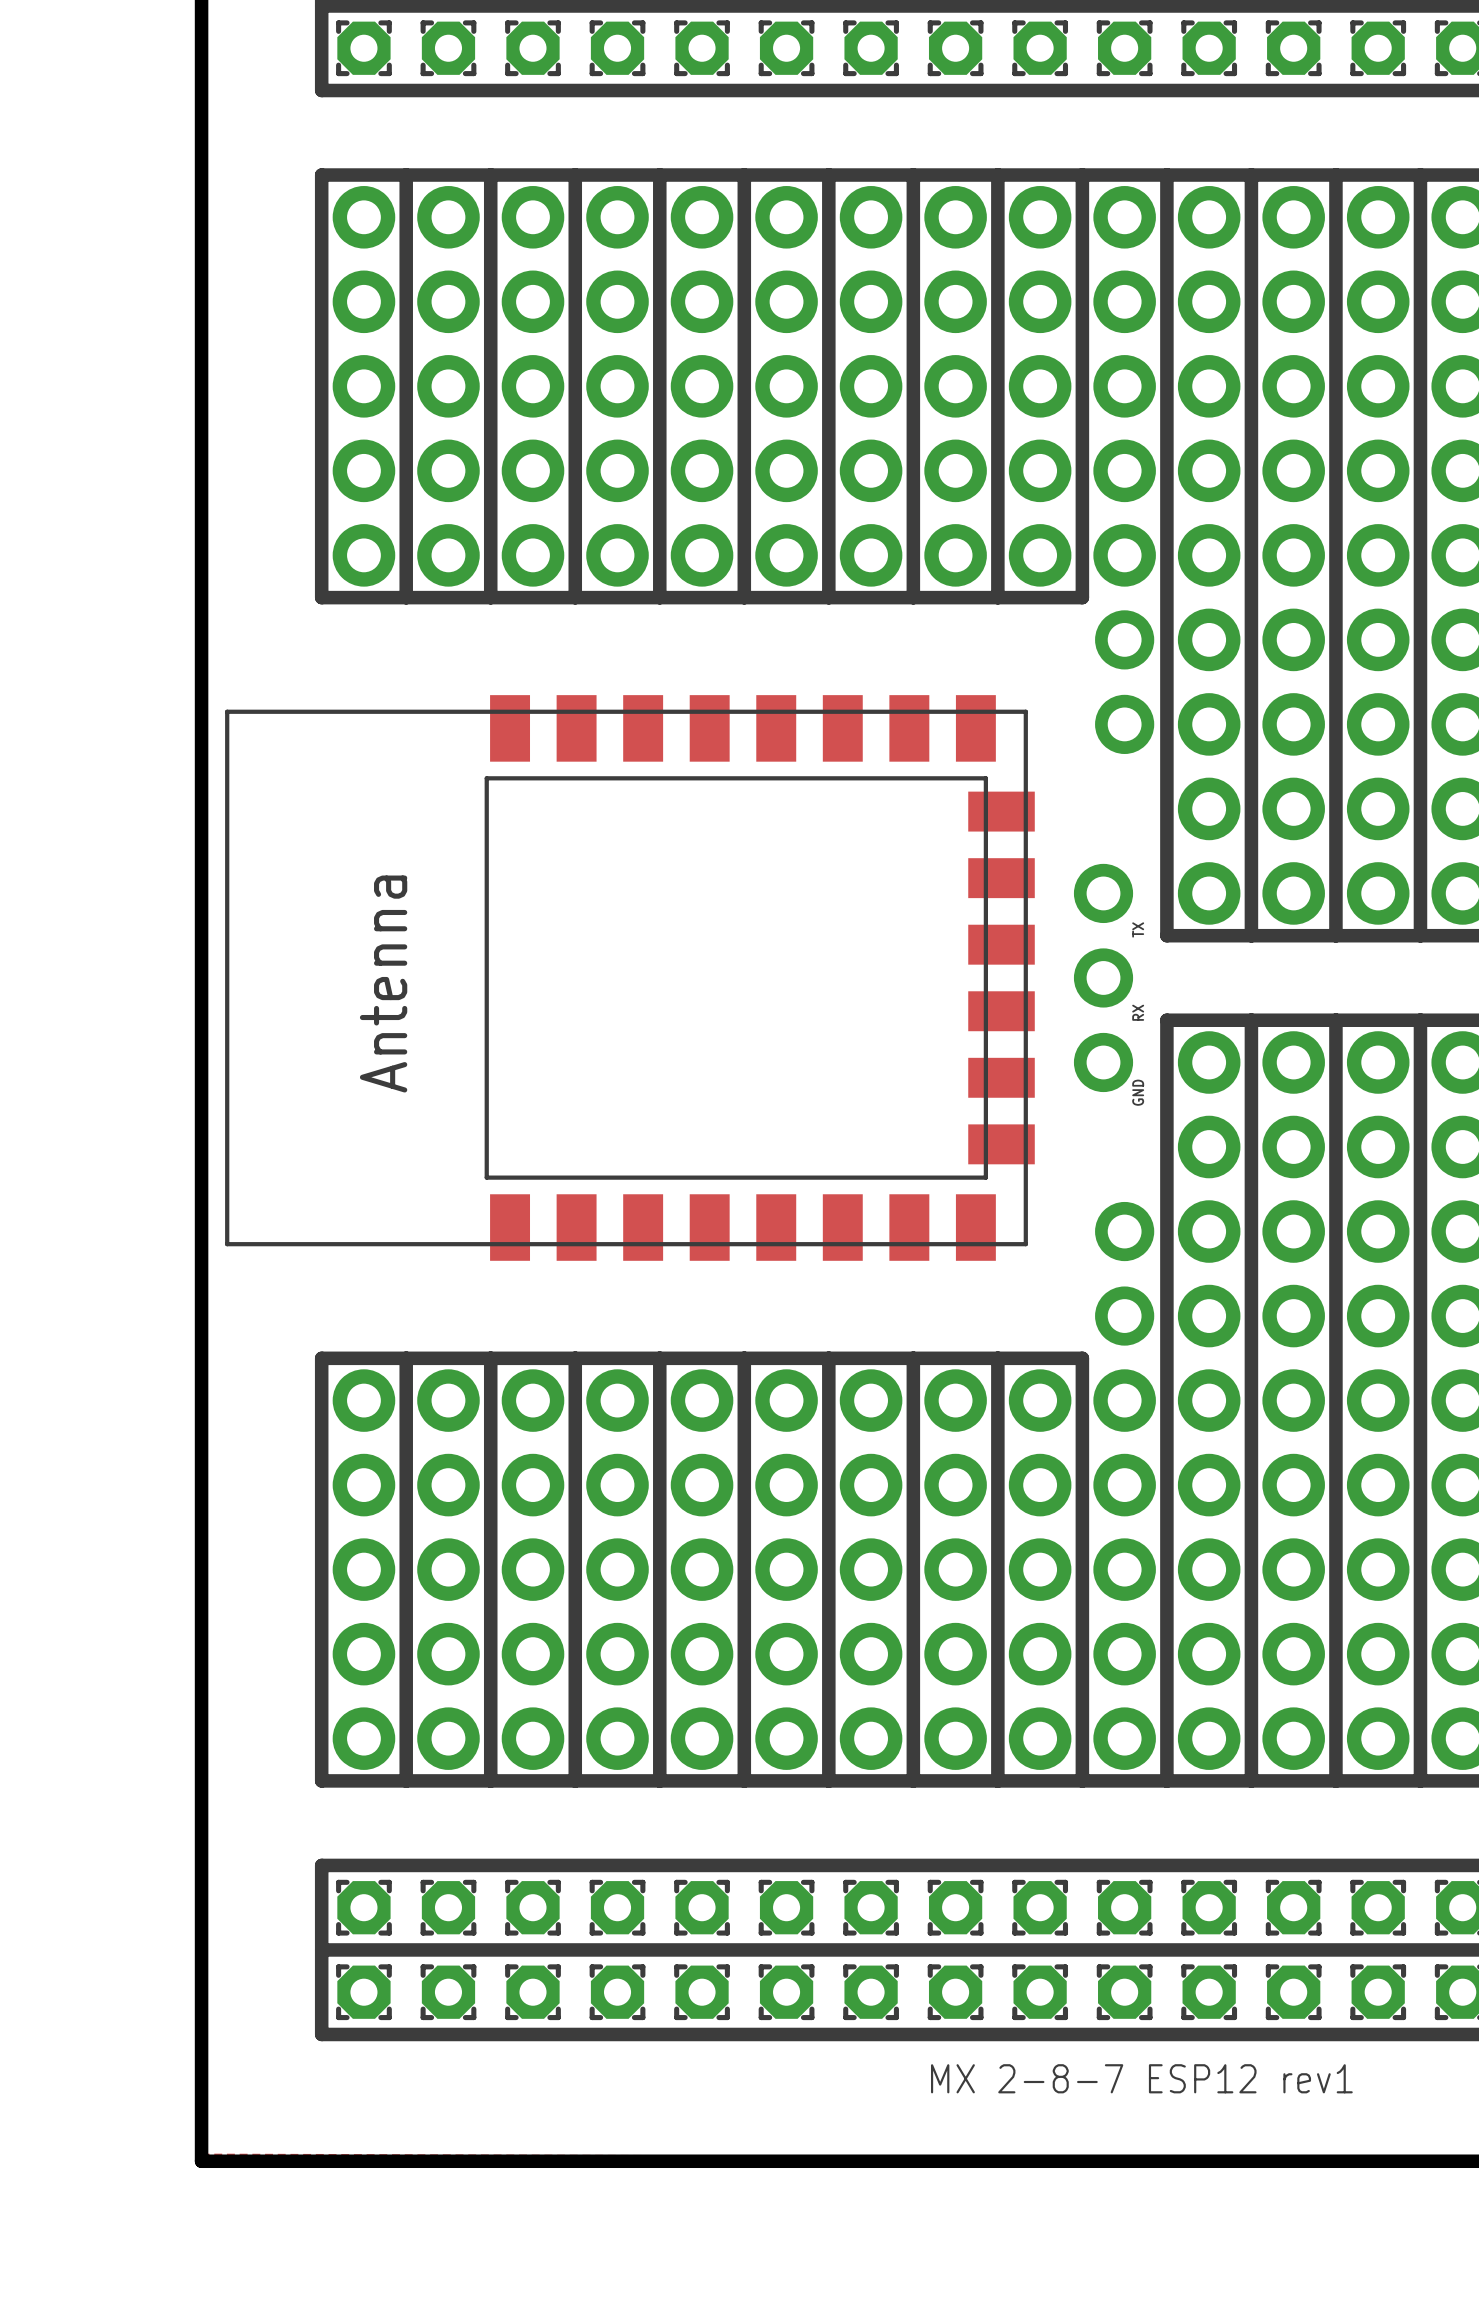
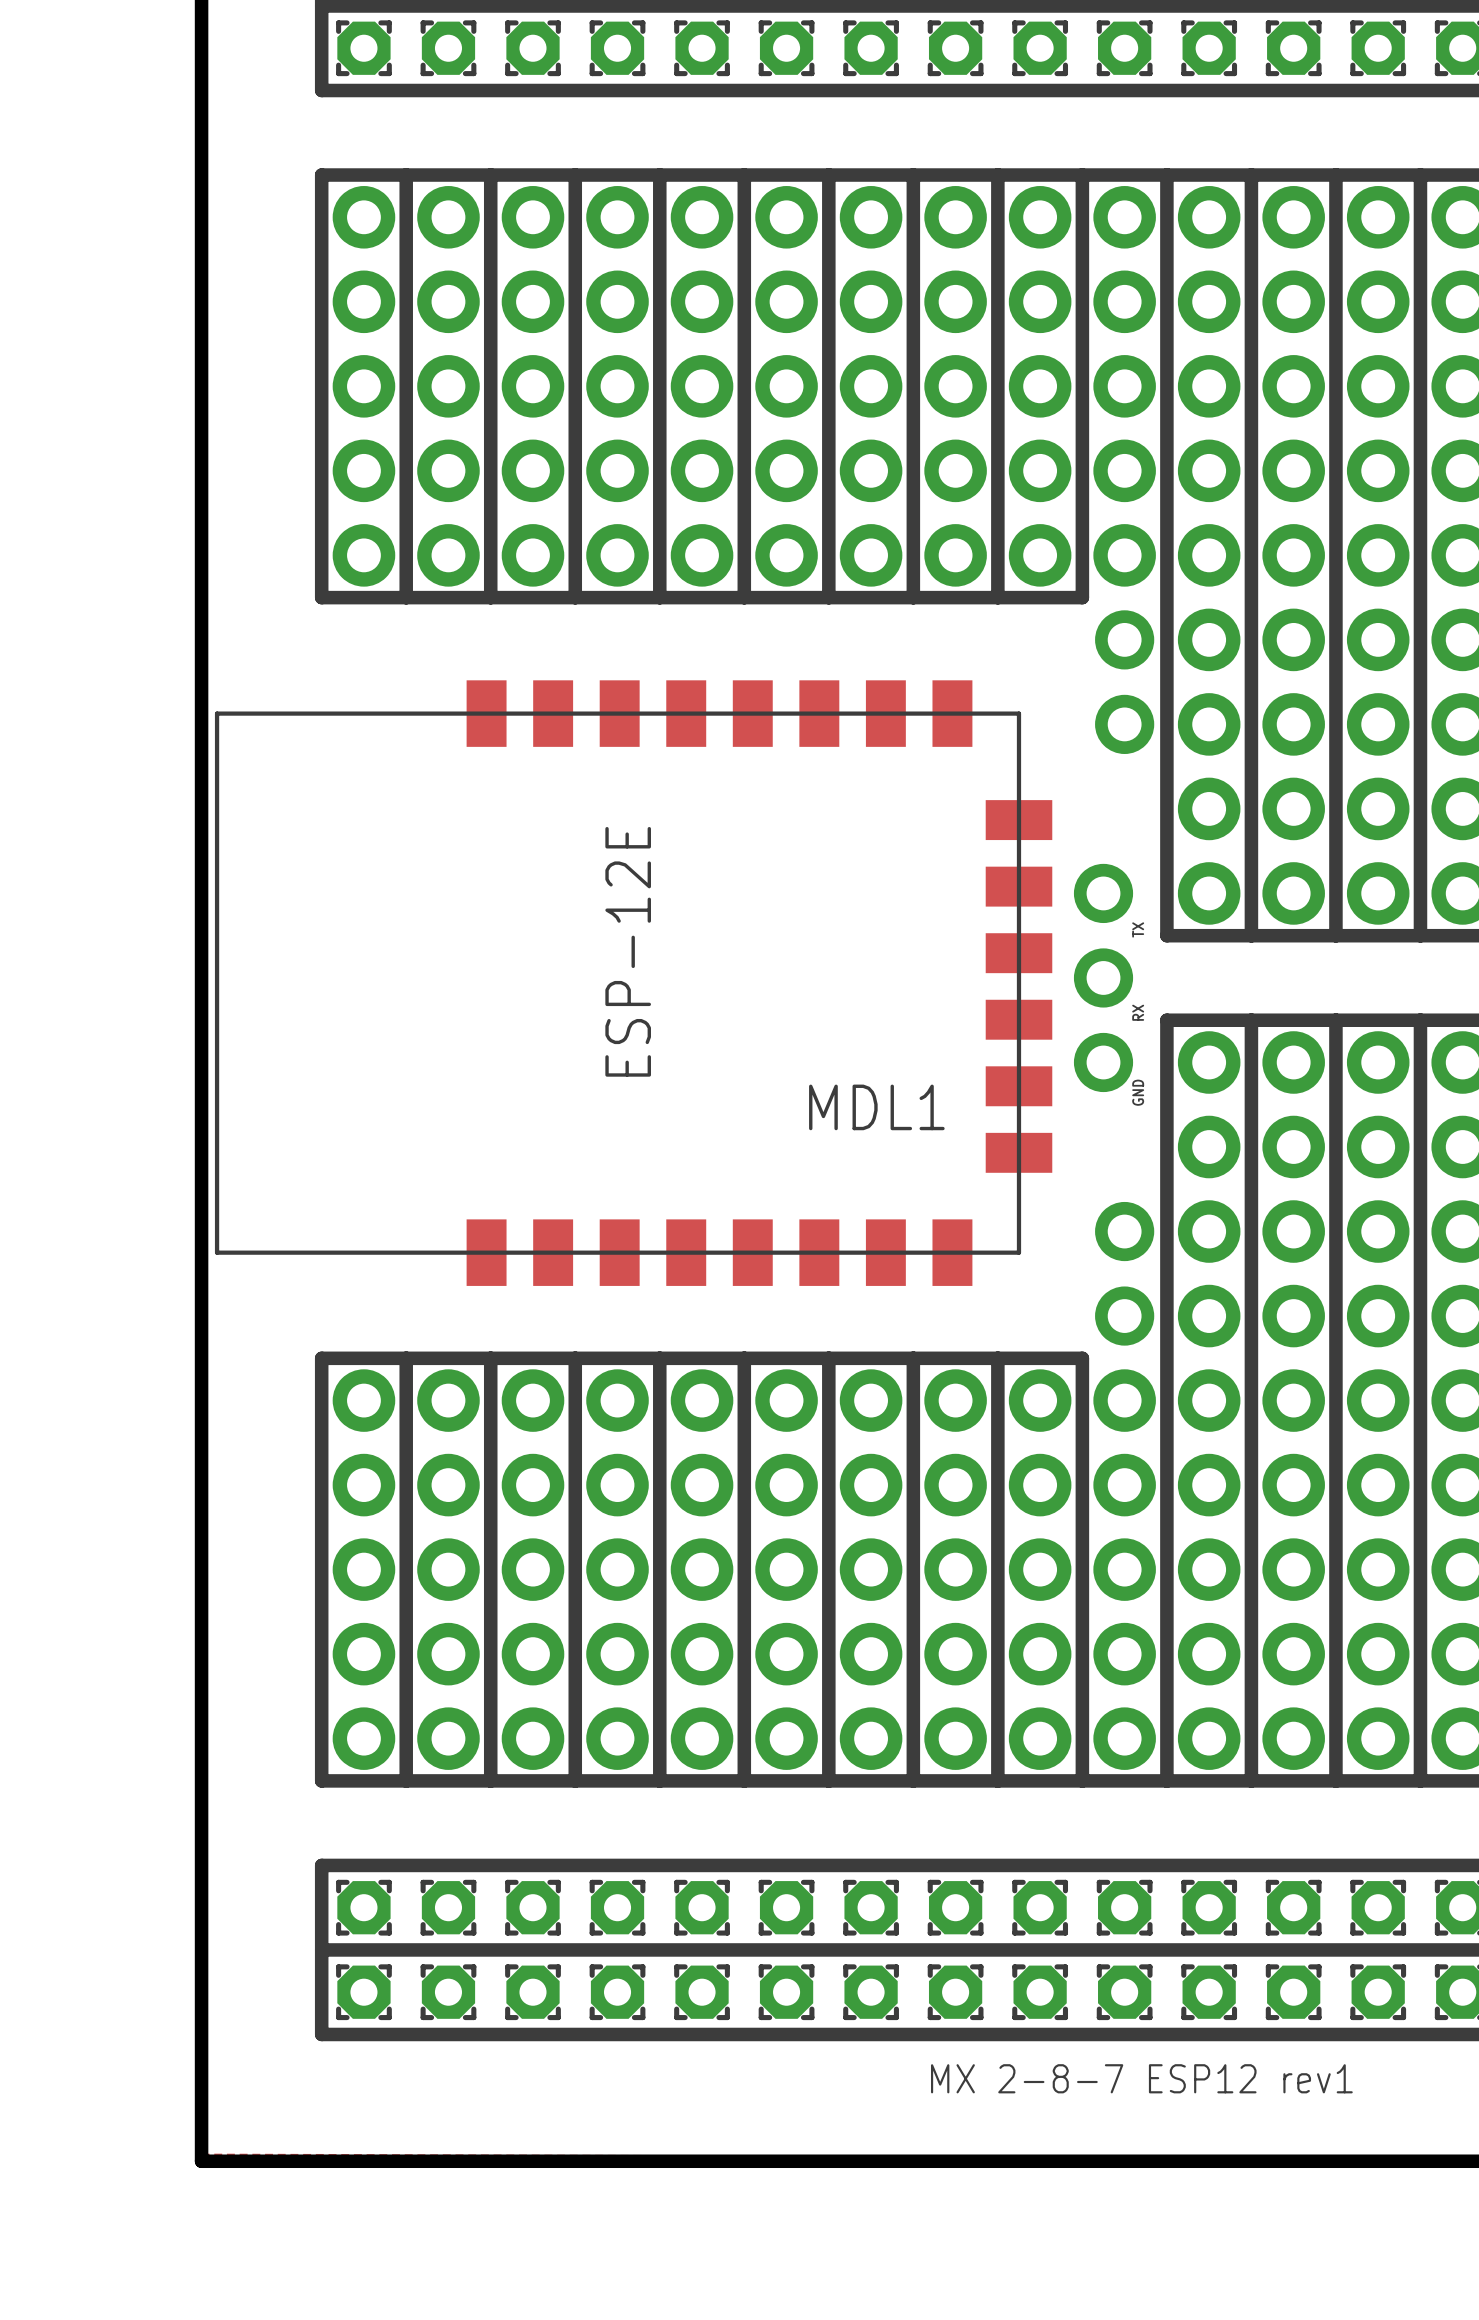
part: (629, 977) -> none
MDL1: none -> (633, 983)

